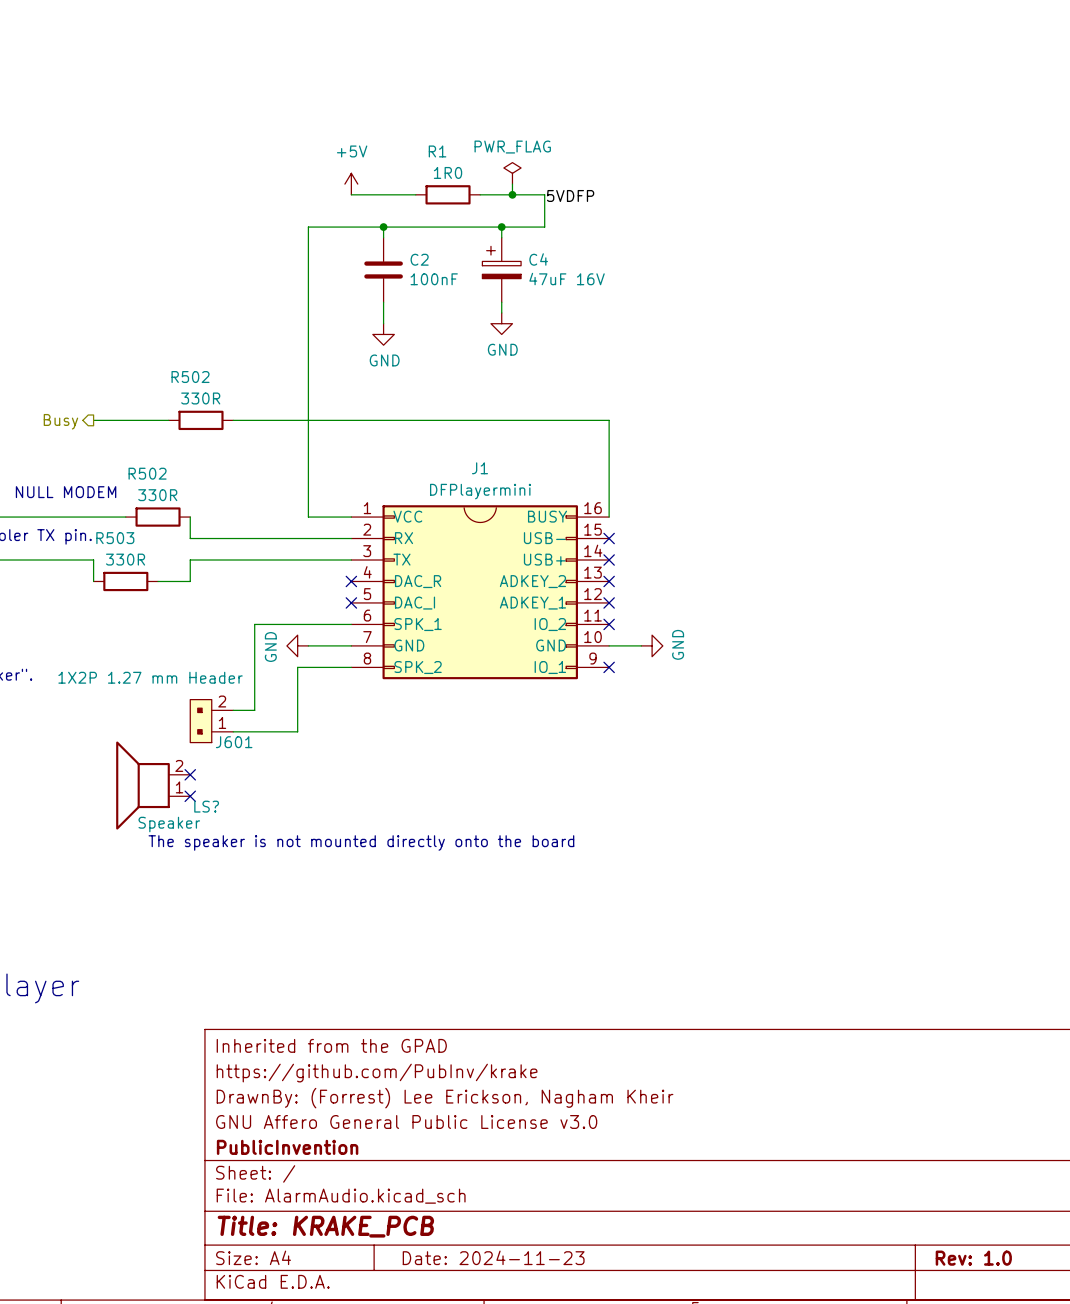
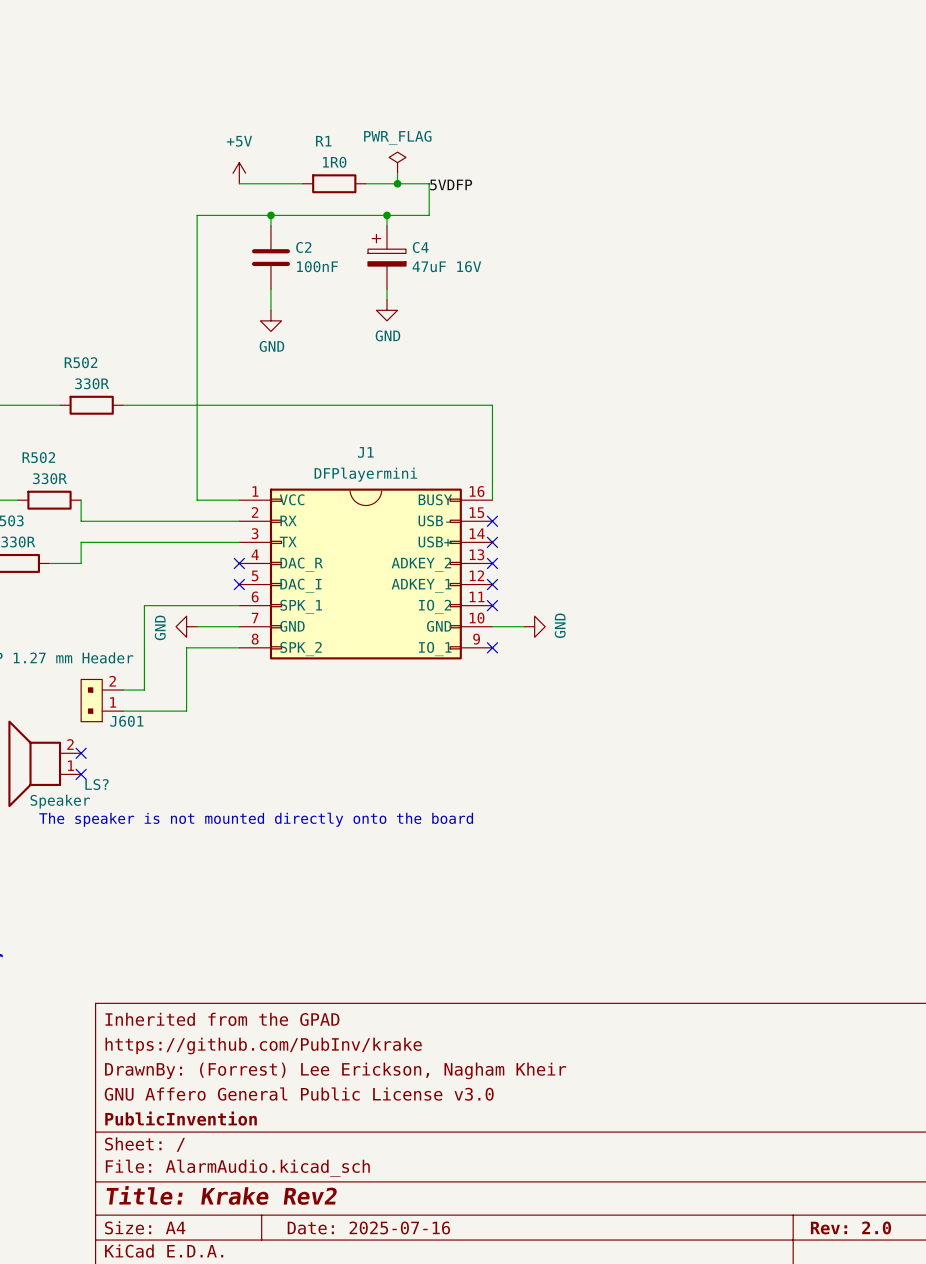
title block: Title: KRAKE_PCB (325, 1226) -> Title: Krake Rev2 (221, 1195)
title block: Date: 2024-11-23 (493, 1257) -> Date: 2025-07-16 (368, 1227)
title block: Rev: 1.0 (973, 1258) -> Rev: 2.0 (850, 1227)

